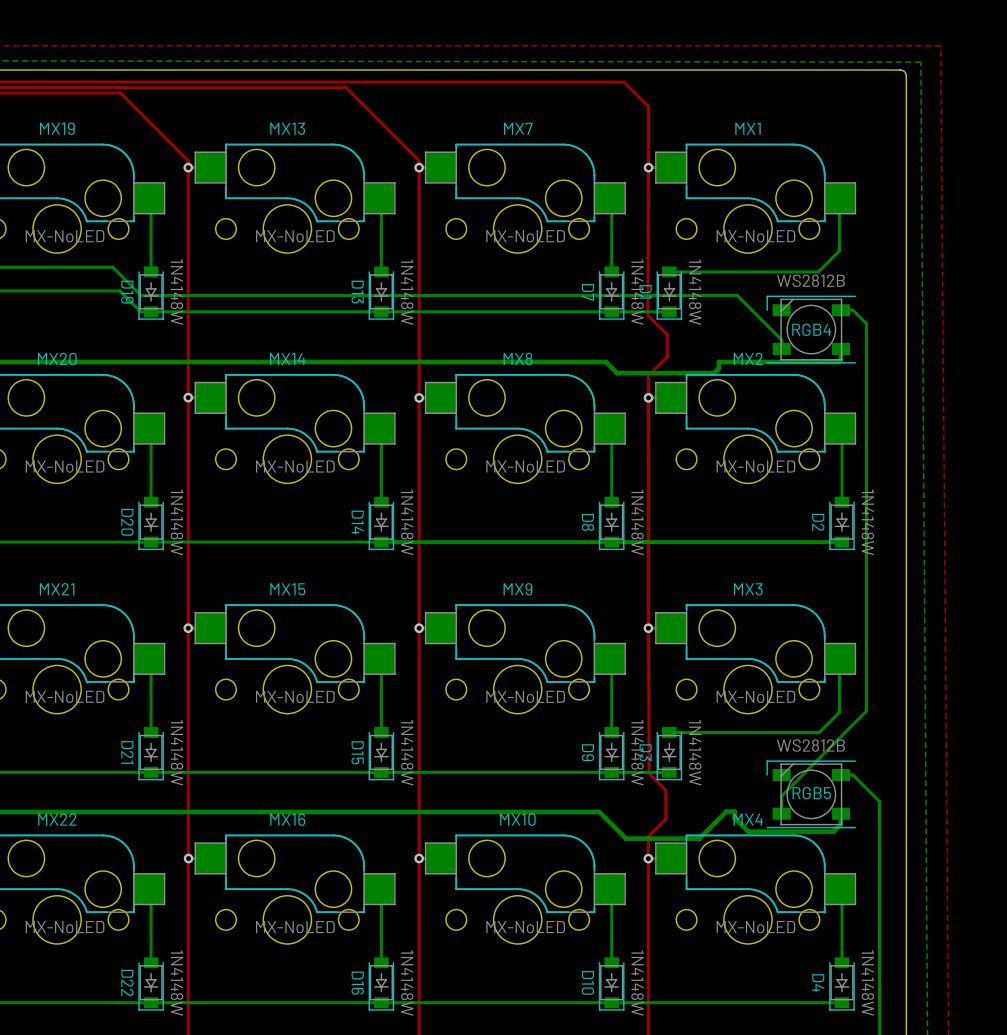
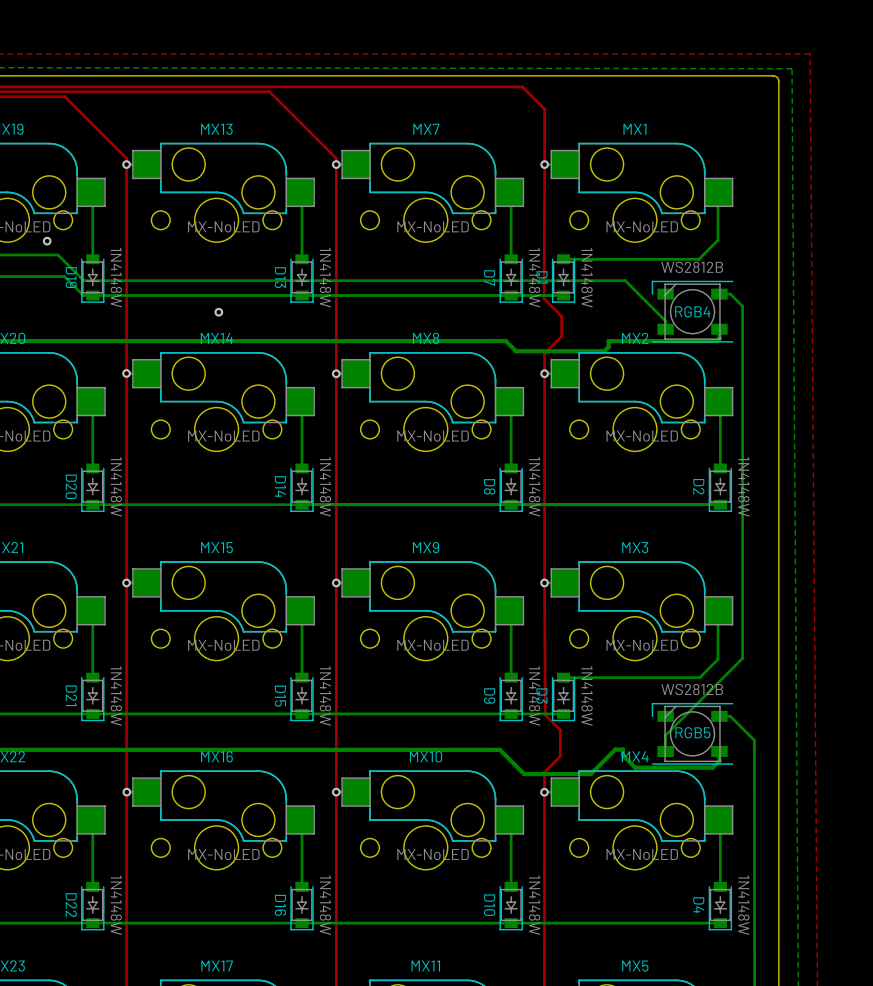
via: none -> (47, 241)
via: none -> (218, 312)

